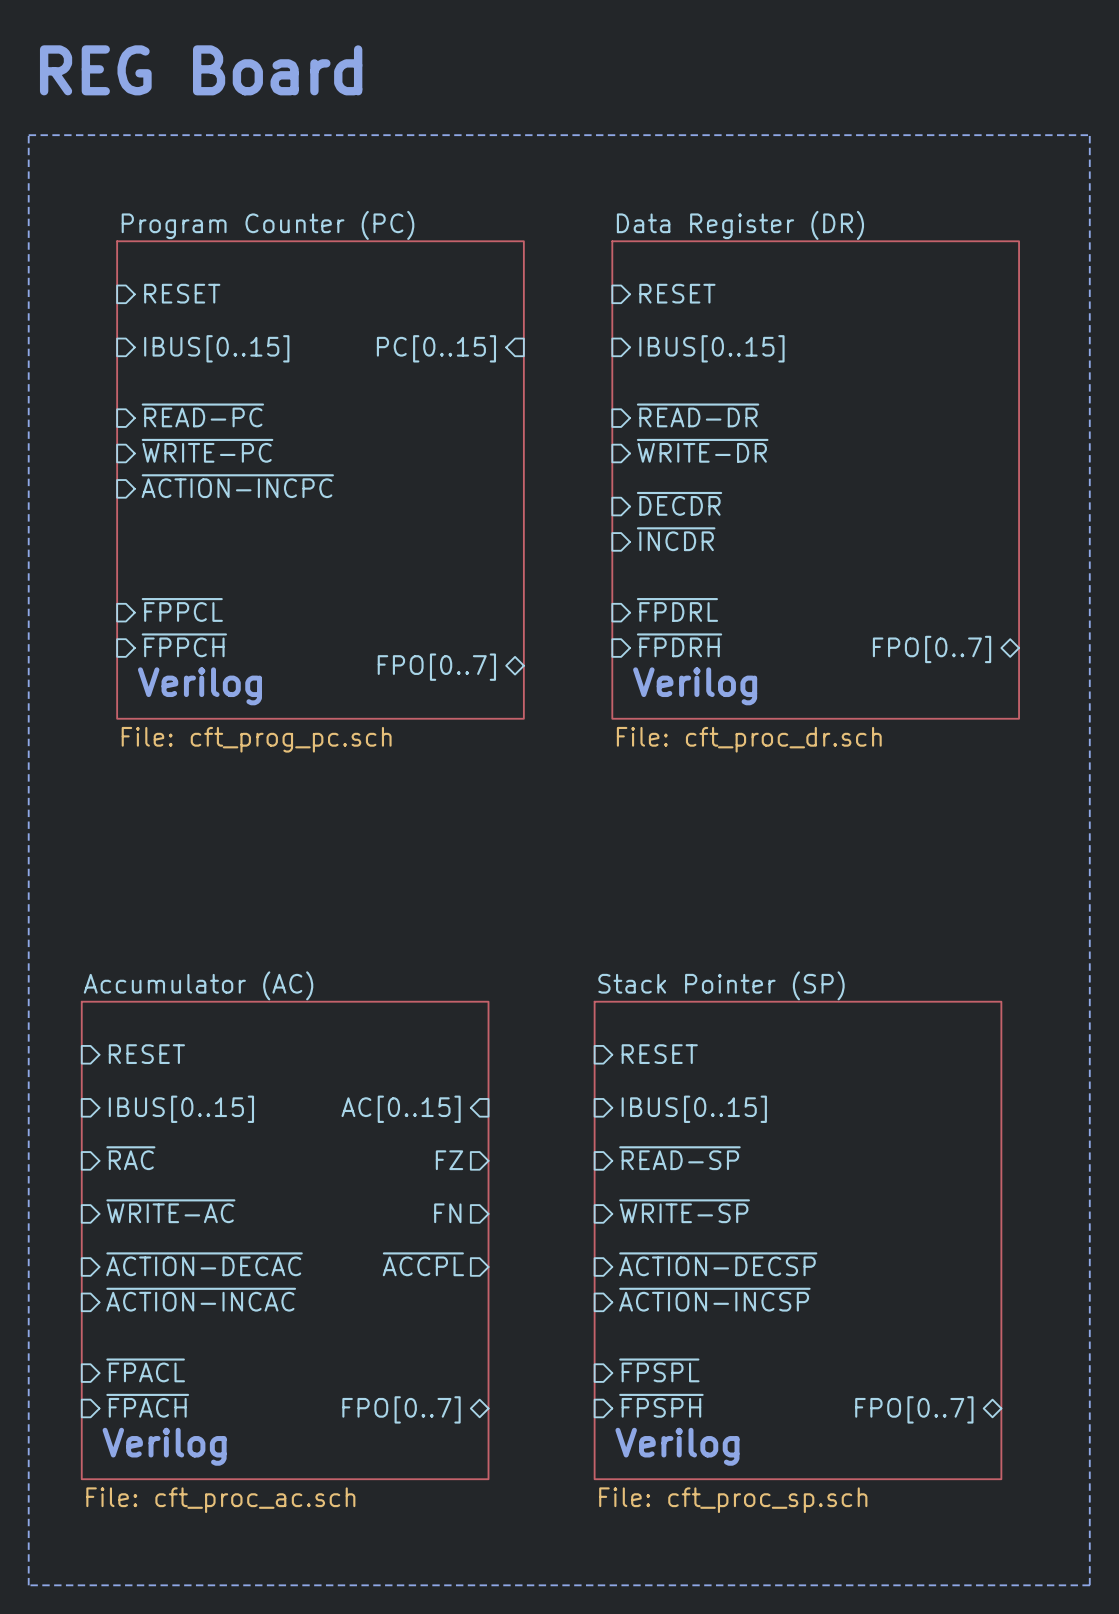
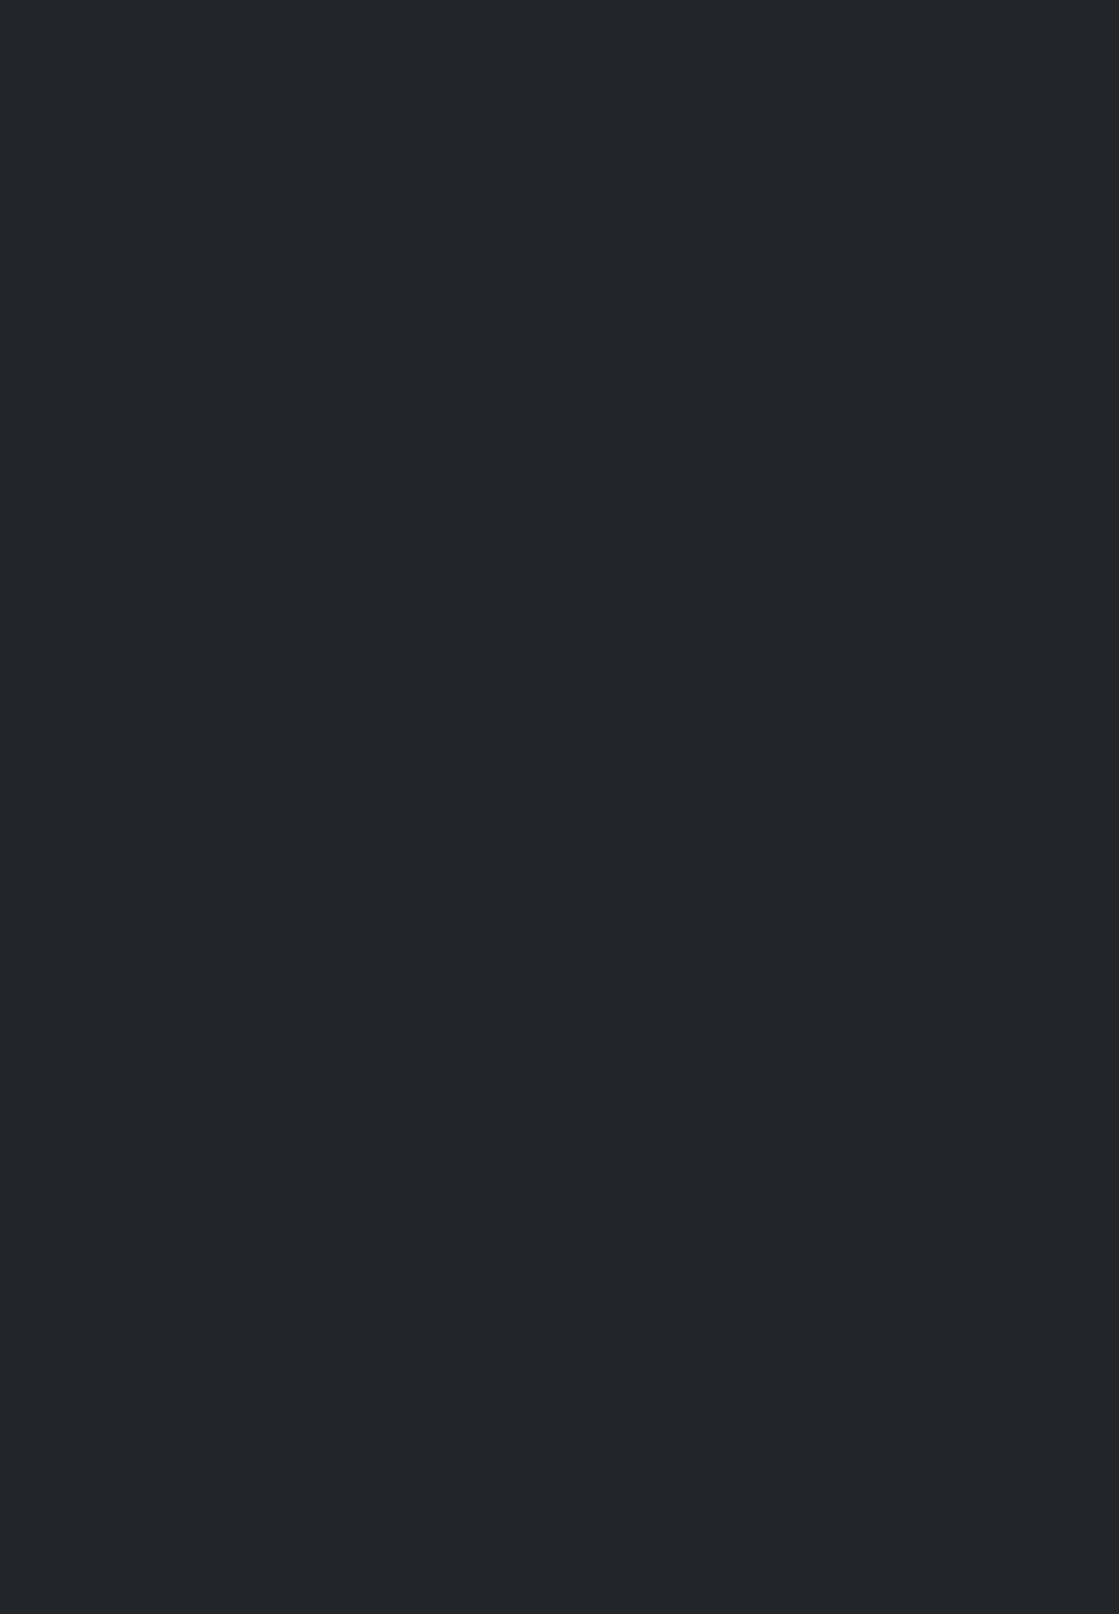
text: REG Board (201, 70) -> none
line: (28, 135) (1089, 135) (1089, 1585) (28, 1585) (28, 135) -> none
sheet pin: RESET (182, 293) -> none
sheet pin: RESET (677, 293) -> none
sheet pin: IBUS[0..15] (216, 348) -> none
sheet pin: PC[0..15] (436, 348) -> none
sheet pin: IBUS[0..15] (711, 348) -> none
sheet pin: ~{READ-PC} (202, 415) -> none
sheet pin: ~{READ-DR} (698, 415) -> none
sheet pin: ~{WRITE-PC} (207, 450) -> none
sheet pin: ~{WRITE-DR} (702, 450) -> none
sheet Program Counter (PC): File: cft_prog_pc.sch (320, 480) -> none
sheet Data Register (DR): File: cft_proc_dr.sch (815, 480) -> none
sheet pin: ~{ACTION-INCPC} (237, 486) -> none
sheet pin: ~{DECDR} (679, 503) -> none
sheet pin: ~{INCDR} (676, 539) -> none
sheet pin: ~{FPPCL} (182, 609) -> none
sheet pin: ~{FPDRL} (677, 609) -> none
sheet pin: ~{FPPCH} (184, 645) -> none
sheet pin: ~{FPDRH} (679, 645) -> none
sheet pin: FPO[0..7] (932, 649) -> none
sheet pin: FPO[0..7] (436, 667) -> none
text: Verilog (199, 686) -> none
text: Verilog (695, 686) -> none
sheet pin: RESET (146, 1054) -> none
sheet pin: RESET (659, 1054) -> none
sheet pin: IBUS[0..15] (181, 1109) -> none
sheet pin: AC[0..15] (401, 1109) -> none
sheet pin: IBUS[0..15] (694, 1109) -> none
sheet pin: ~{RAC} (130, 1158) -> none
sheet pin: ~{READ-SP} (679, 1158) -> none
sheet pin: FZ (449, 1160) -> none
sheet pin: ~{WRITE-AC} (170, 1211) -> none
sheet pin: ~{WRITE-SP} (684, 1211) -> none
sheet pin: FN (447, 1213) -> none
sheet Accumulator (AC): File: cft_proc_ac.sch (285, 1240) -> none
sheet Stack Pointer (SP): File: cft_proc_sp.sch (797, 1240) -> none
sheet pin: ~{ACTION-DECAC} (204, 1264) -> none
sheet pin: ~{ACCPL} (423, 1264) -> none
sheet pin: ~{ACTION-DECSP} (718, 1264) -> none
sheet pin: ~{ACTION-INCAC} (201, 1299) -> none
sheet pin: ~{ACTION-INCSP} (714, 1299) -> none
sheet pin: ~{FPACL} (145, 1370) -> none
sheet pin: ~{FPSPL} (659, 1370) -> none
sheet pin: ~{FPACH} (147, 1405) -> none
sheet pin: ~{FPSPH} (661, 1405) -> none
sheet pin: FPO[0..7] (401, 1409) -> none
sheet pin: FPO[0..7] (914, 1409) -> none
text: Verilog (164, 1446) -> none
text: Verilog (677, 1446) -> none

